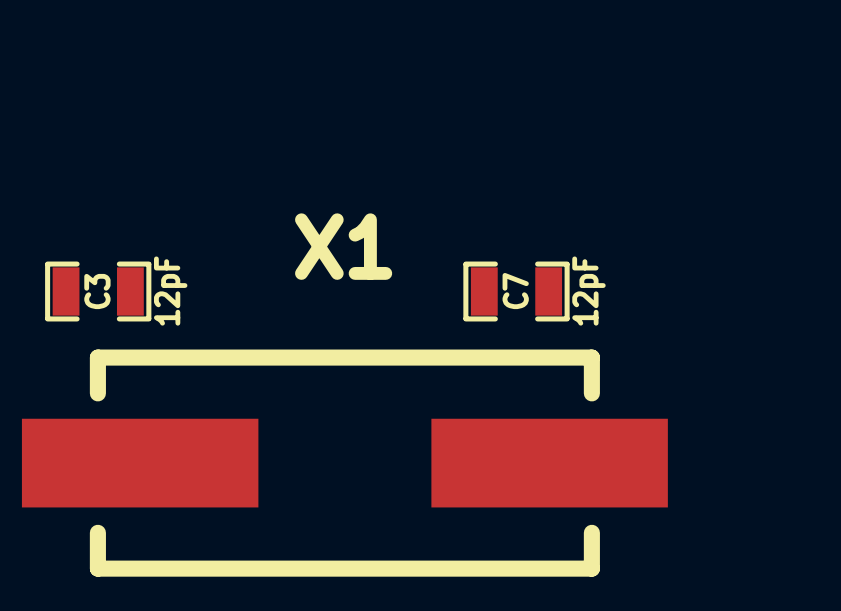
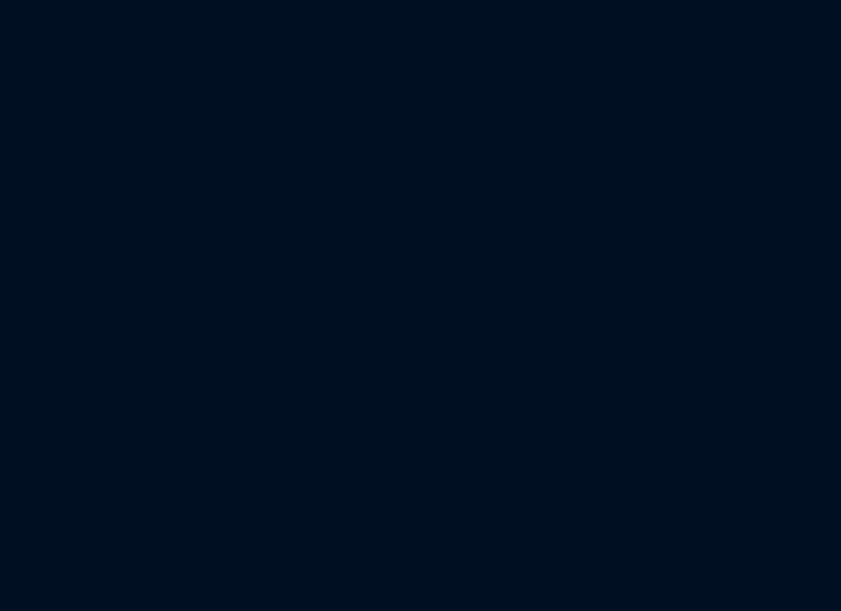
C3: 12pF (98, 291) -> none
C7: 12pF (516, 291) -> none
X1: (344, 463) -> none

